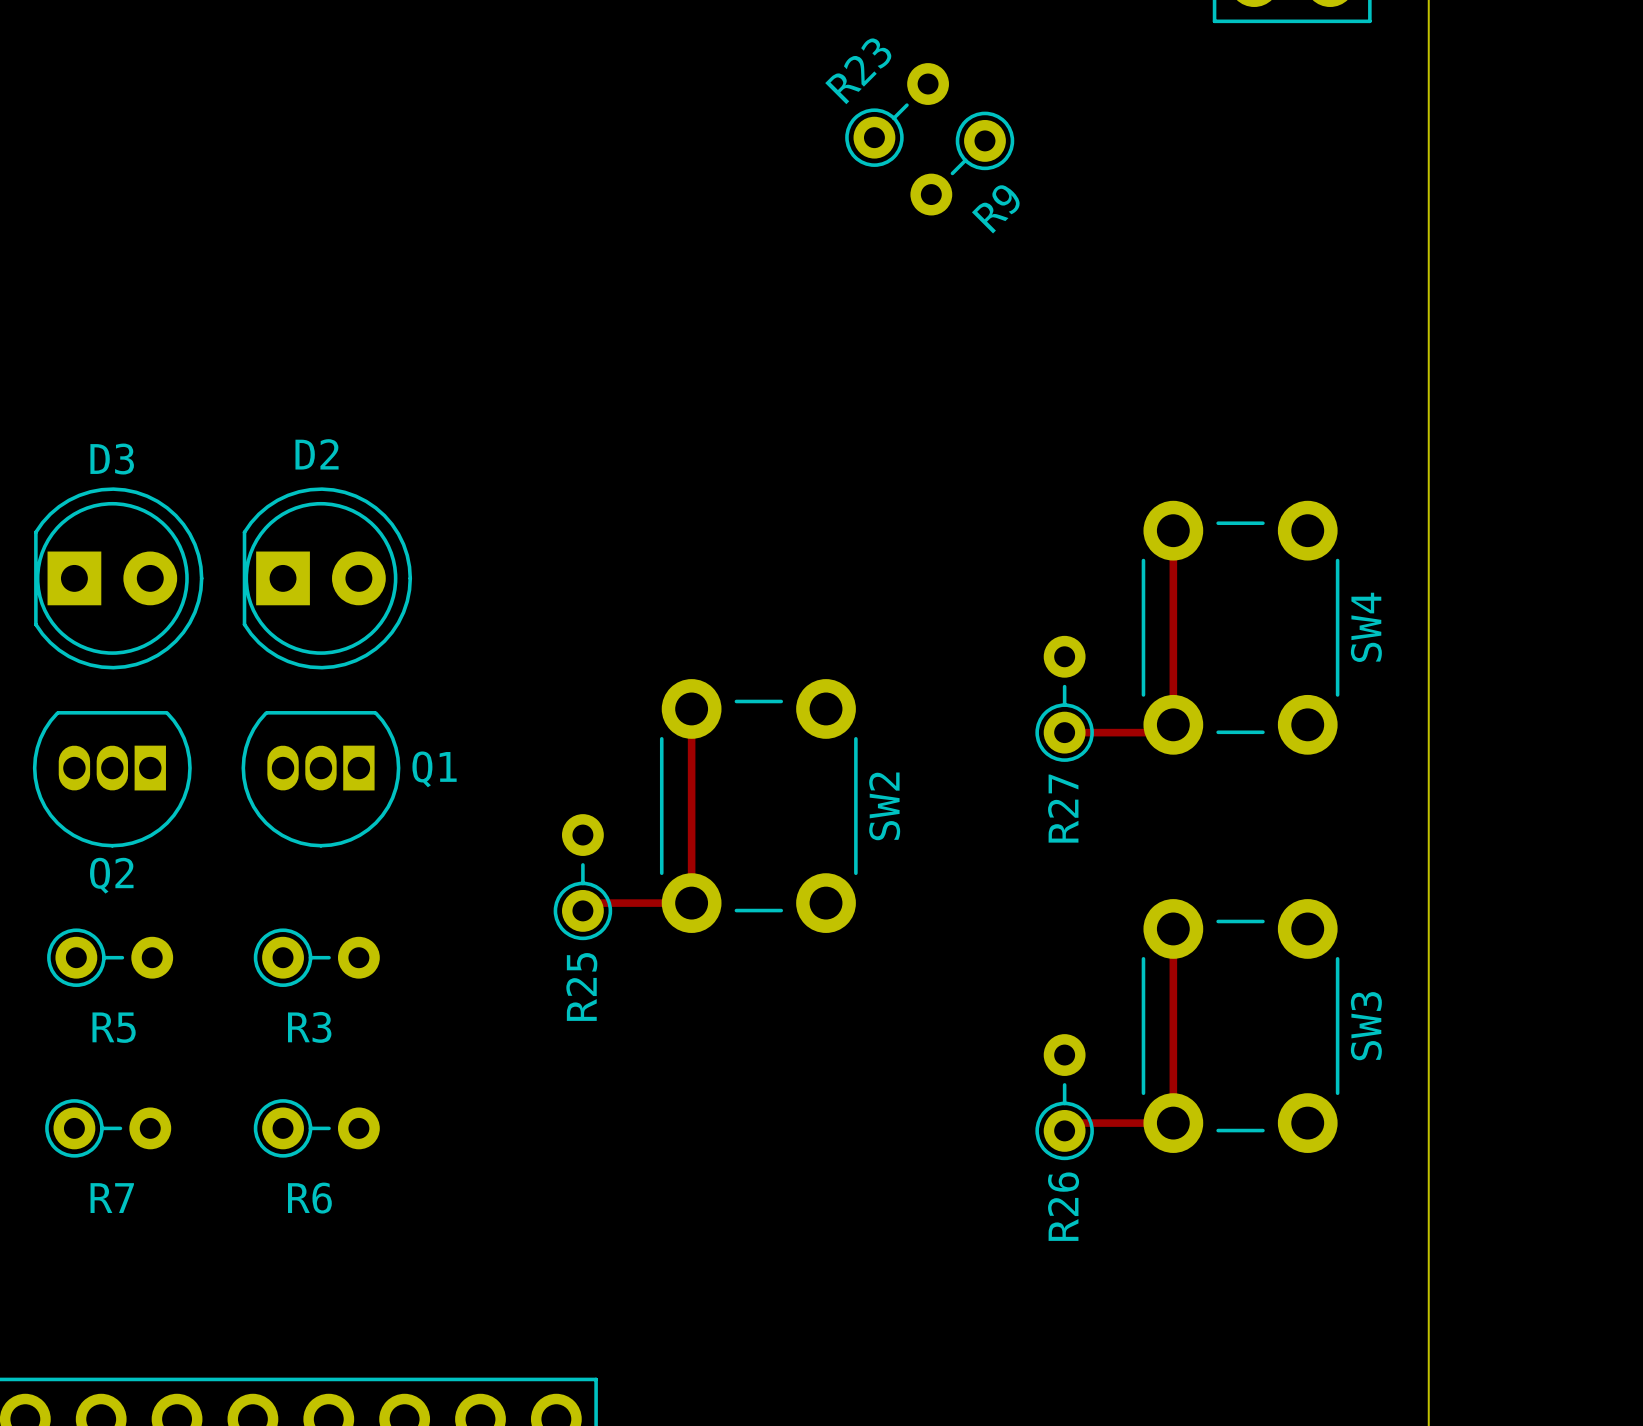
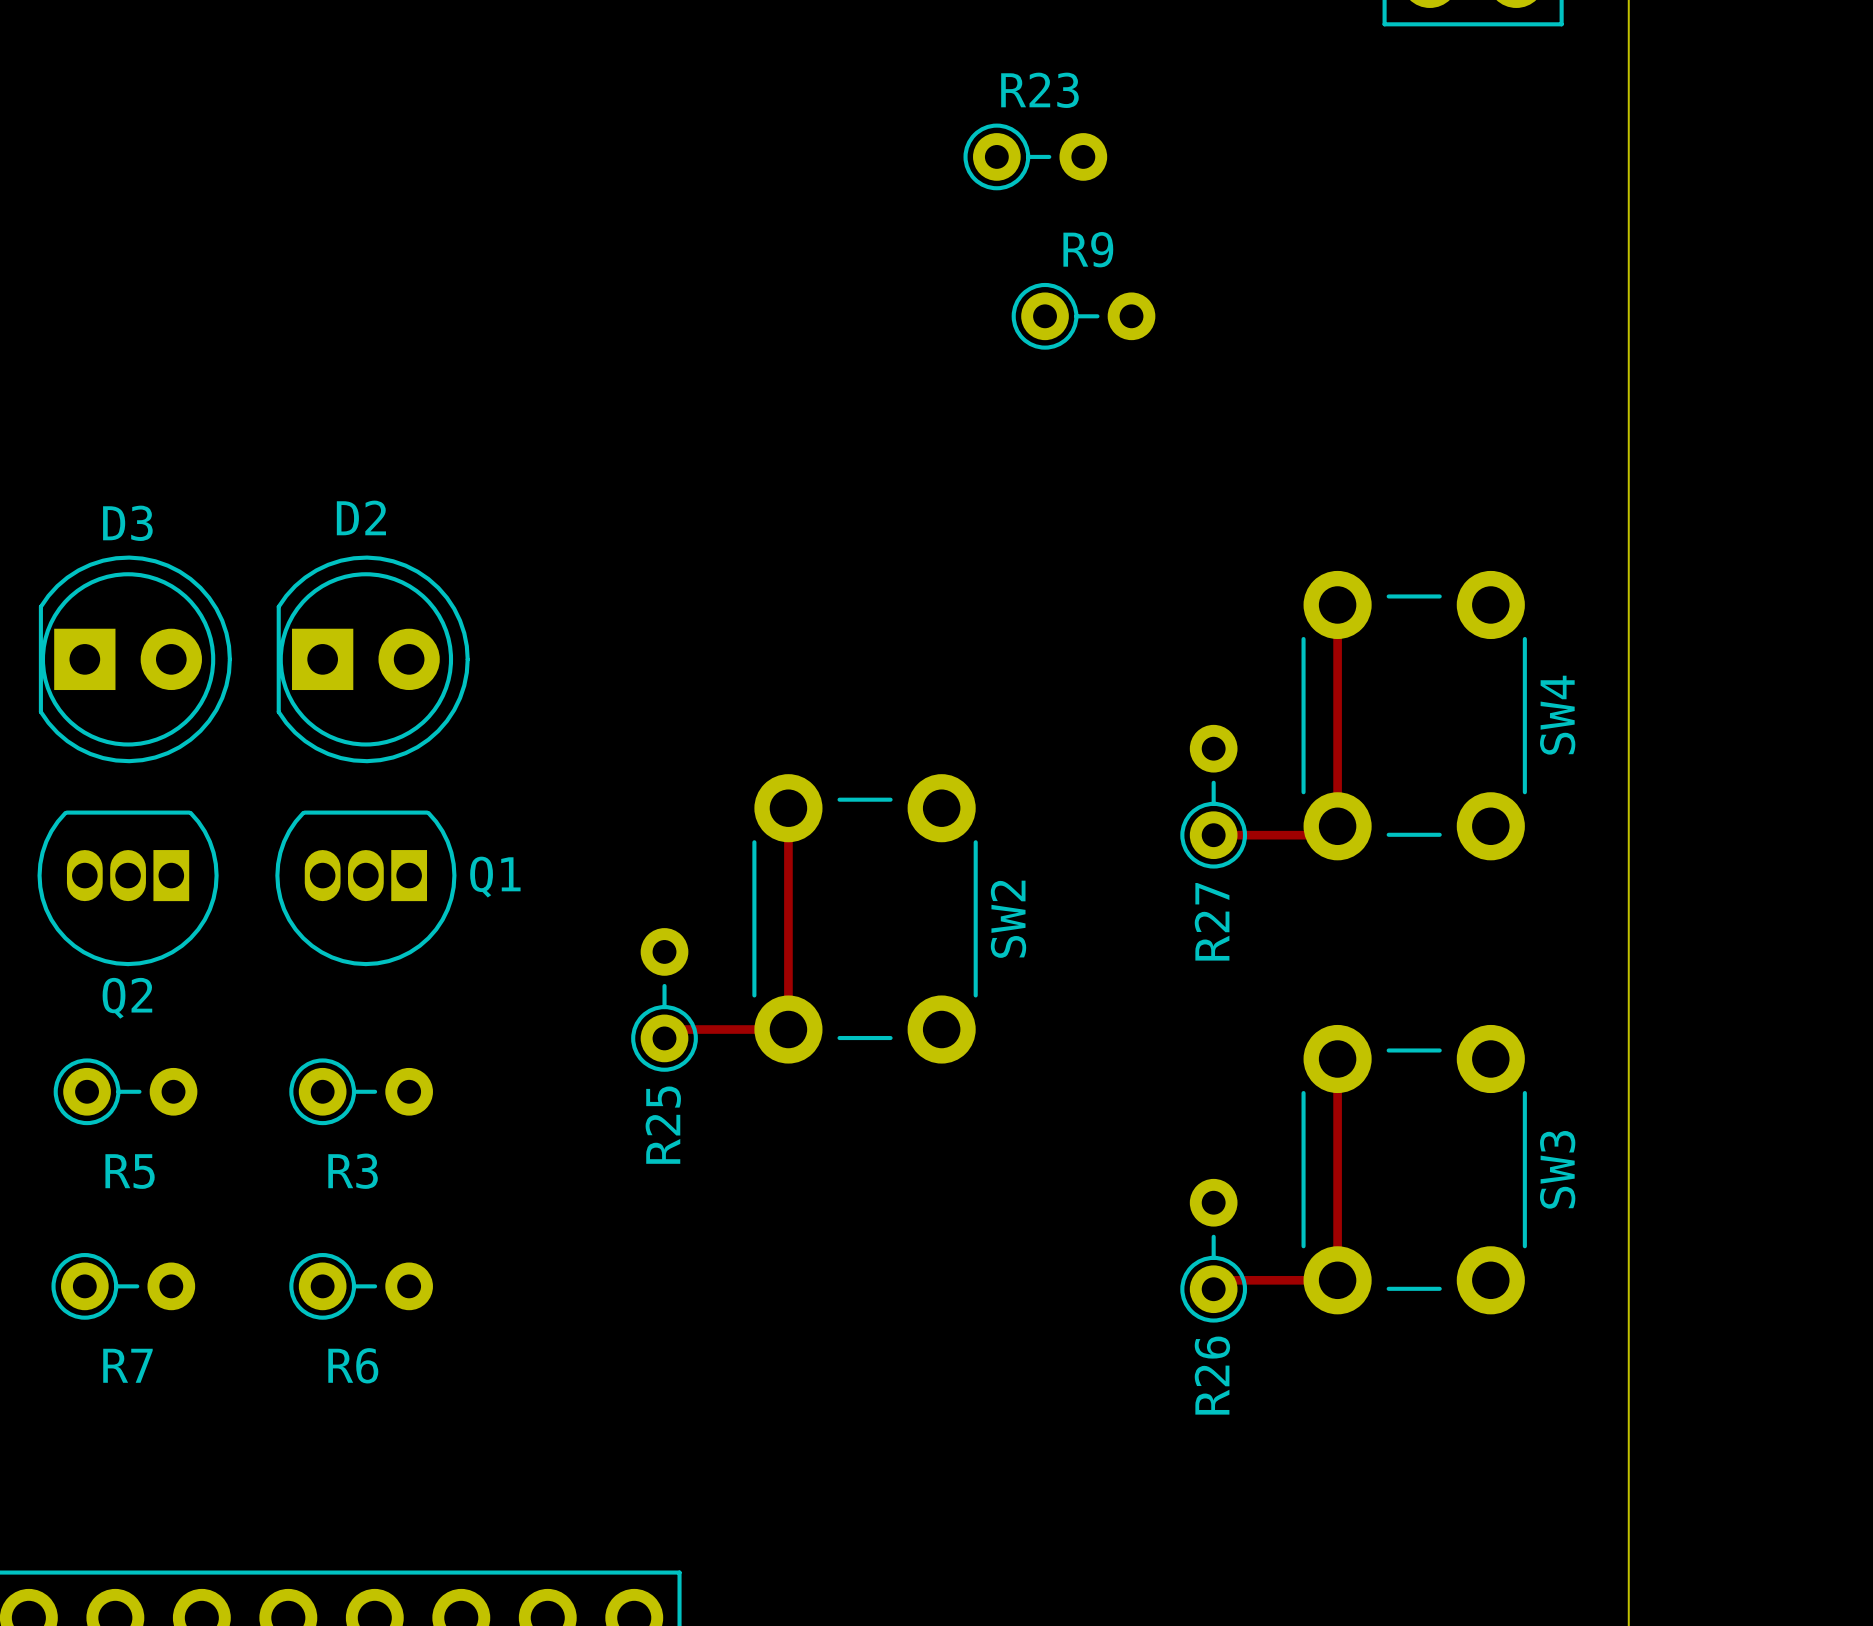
R23 rotation: 0° (897, 115) -> 45° clockwise (1035, 156)
R9 rotation: 0° (962, 163) -> 135° counterclockwise (1083, 316)
R9 position: (962, 163) -> (1083, 316)

